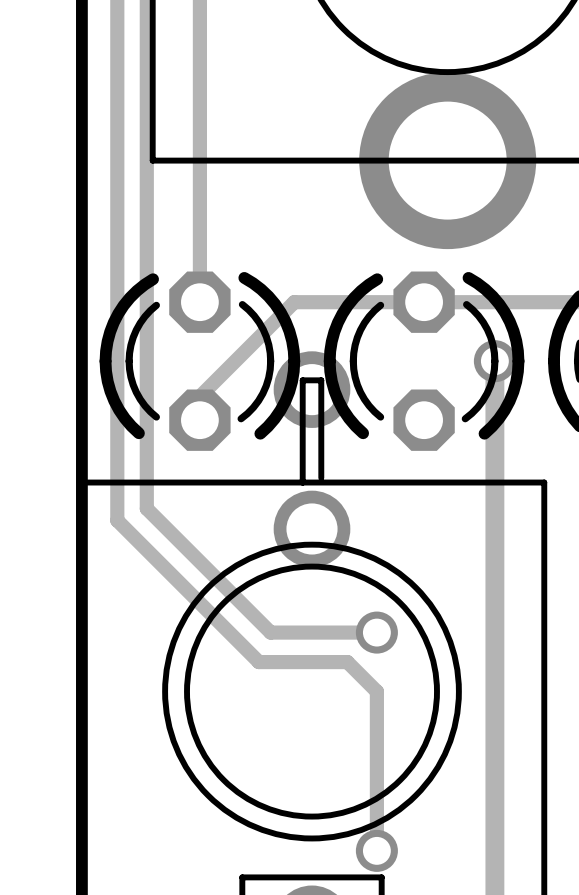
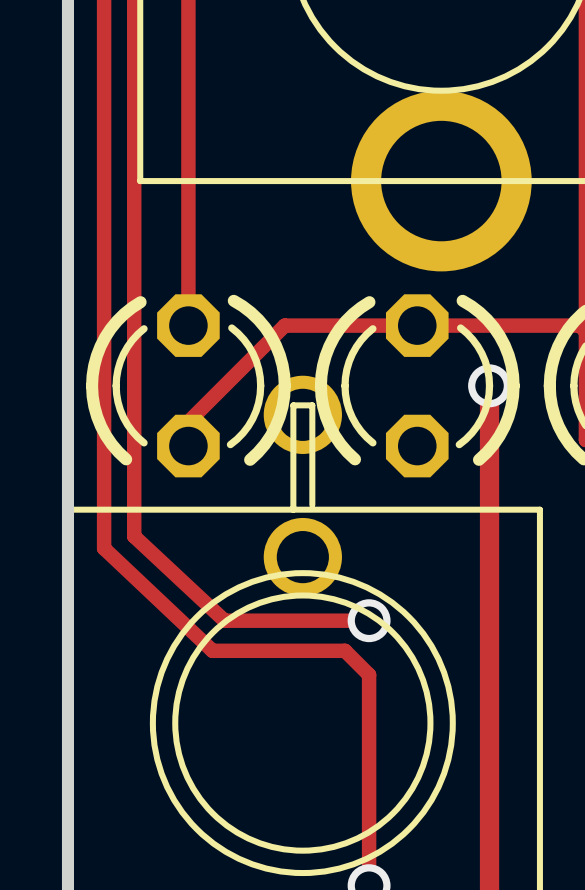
track: (146, 508) (270, 632) (376, 632) -> (134, 536) (224, 620) (369, 620)
track: (117, 520) (258, 662) (347, 662) (376, 691) -> (104, 548) (212, 650) (345, 650) (369, 674) (369, 723)
via position: (376, 632) -> (369, 620)

